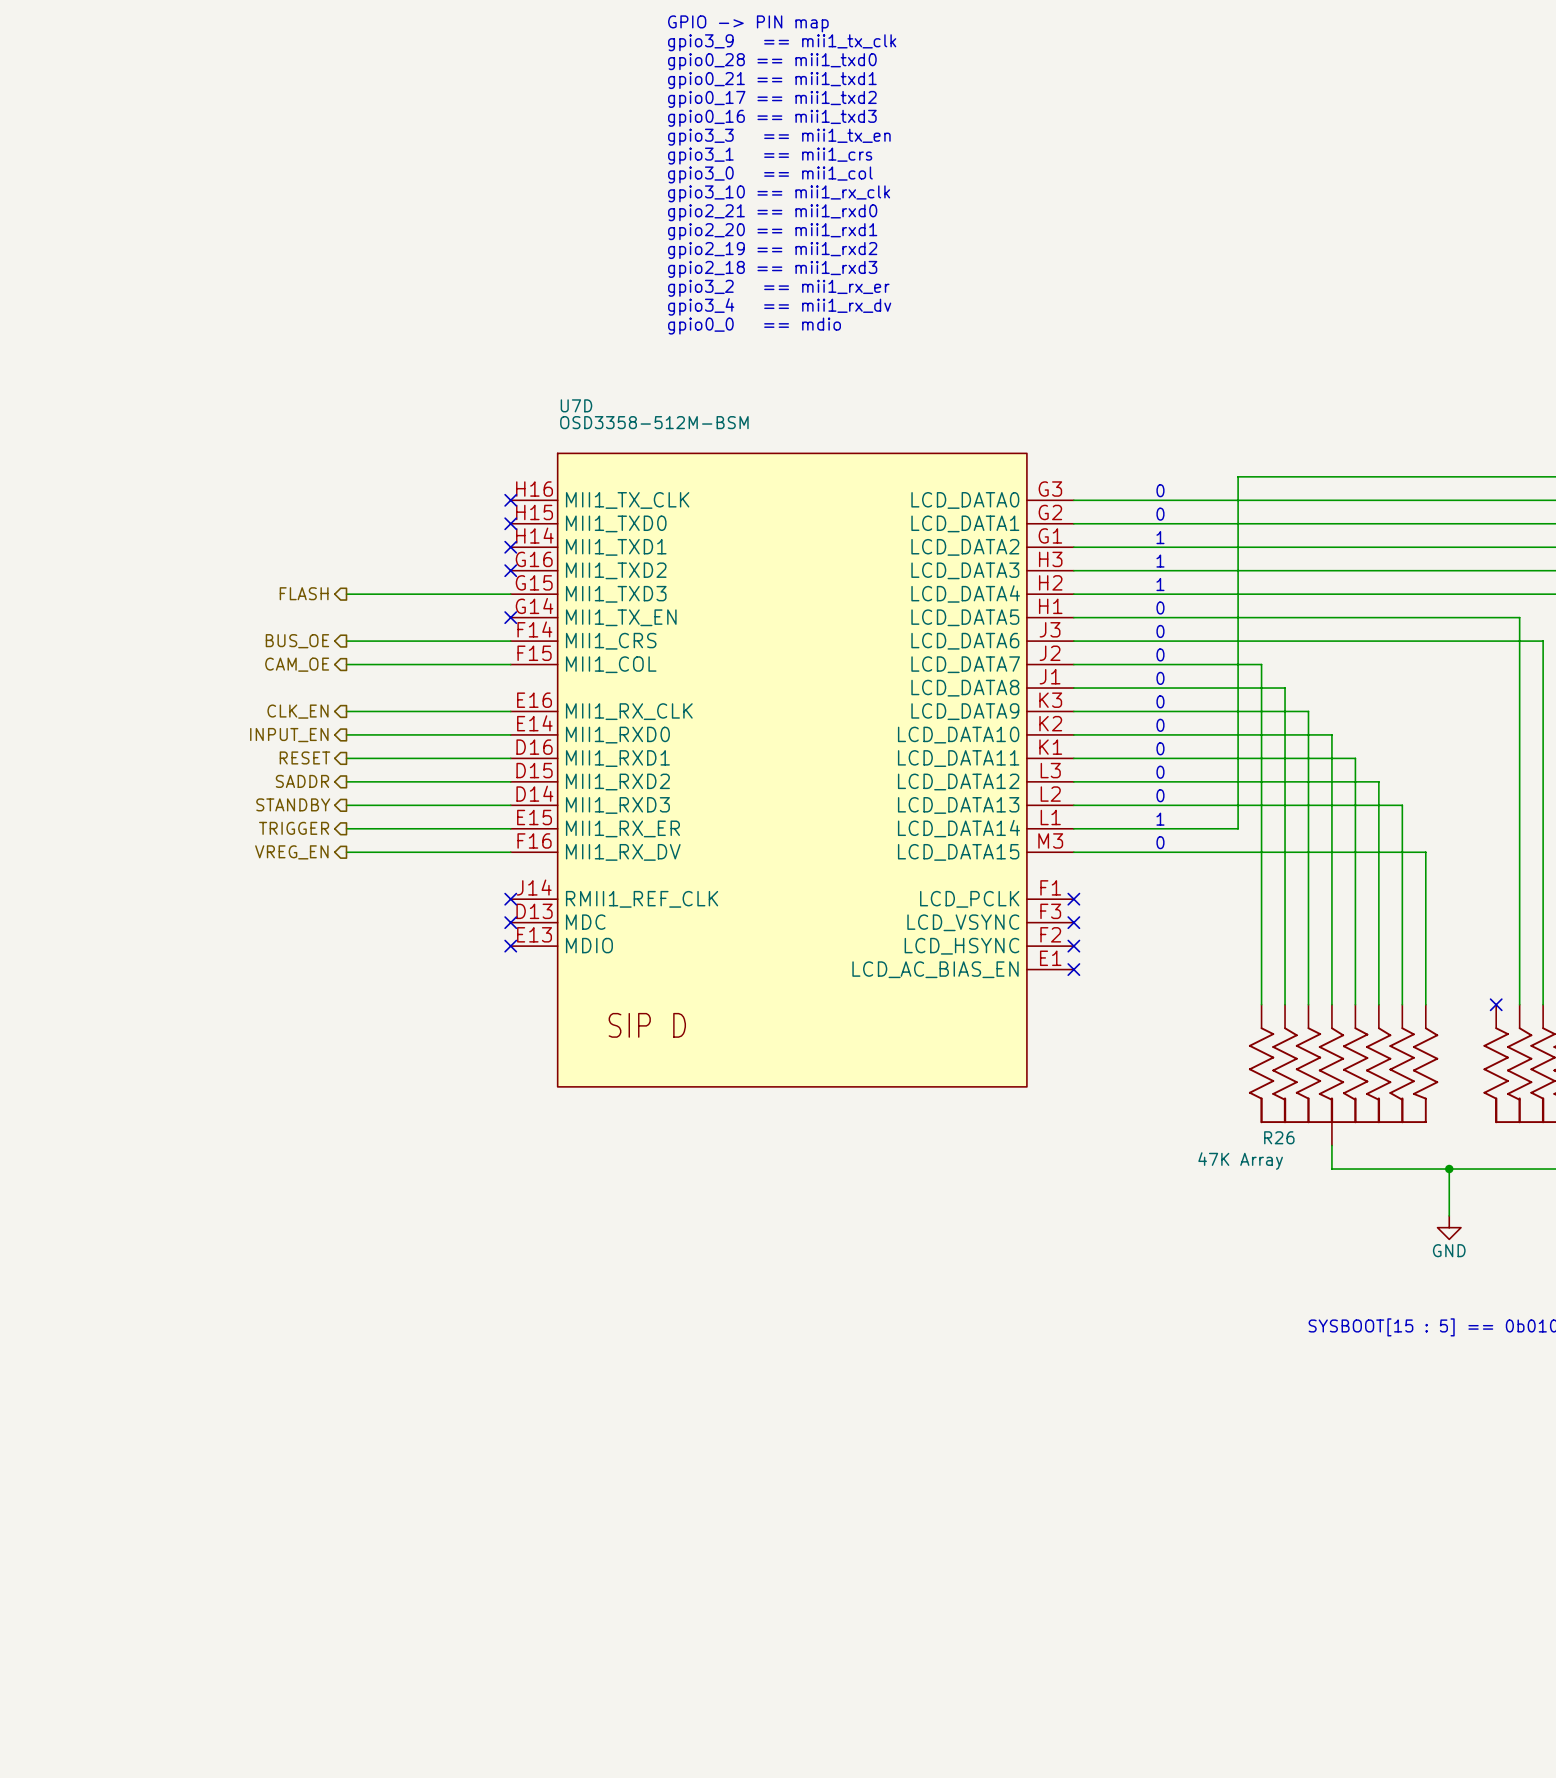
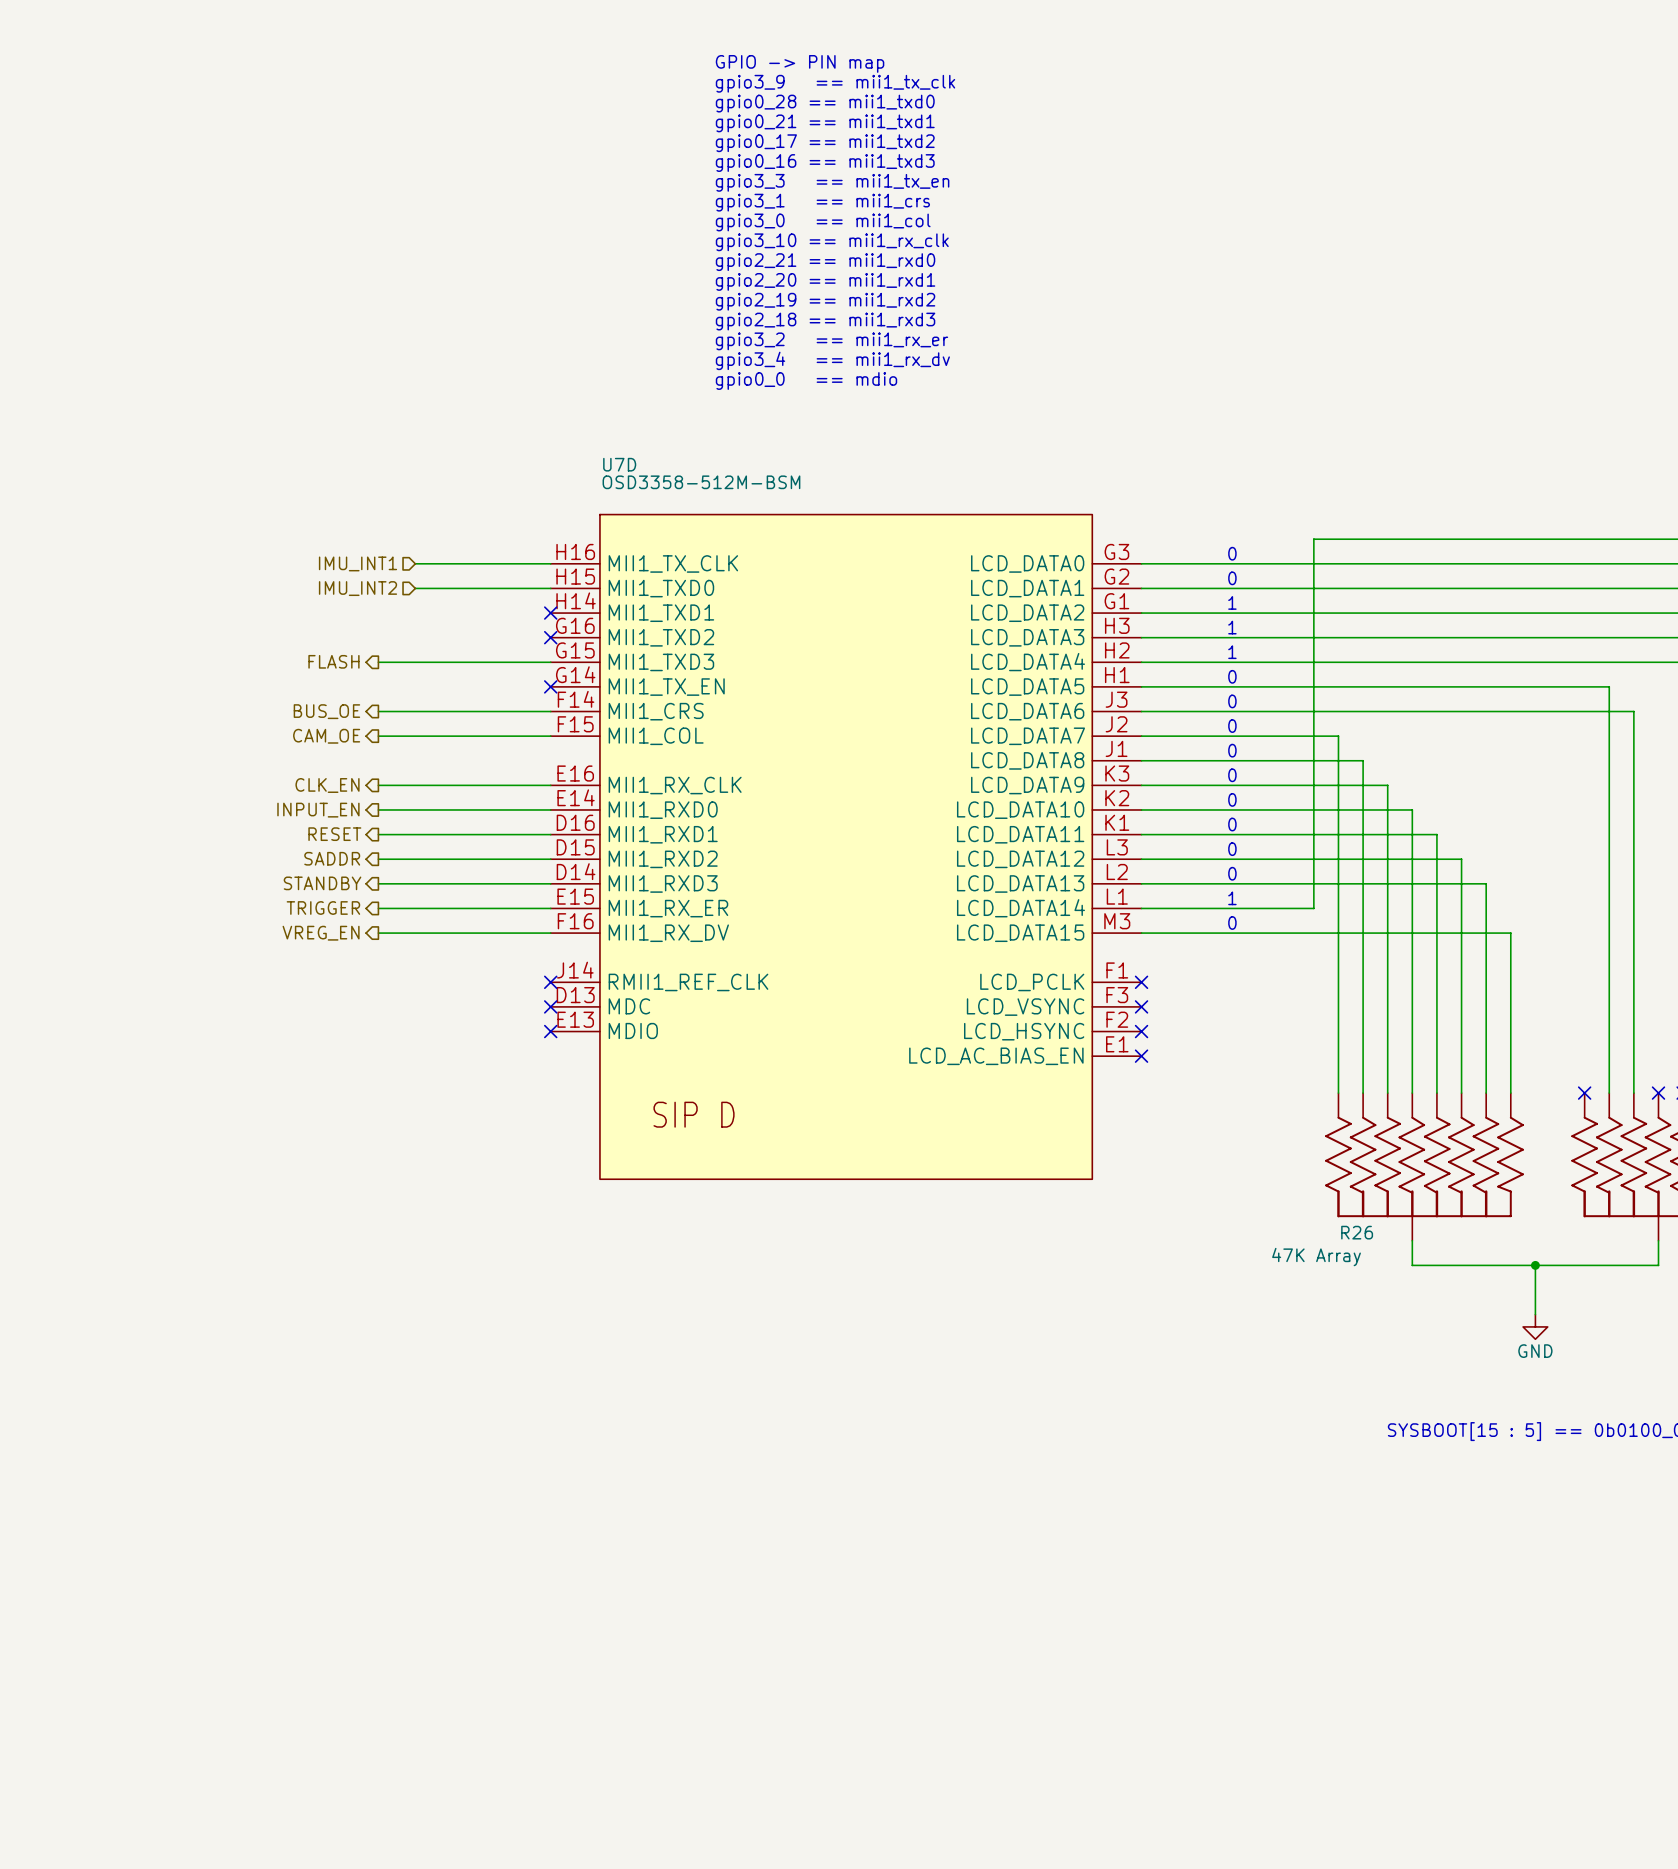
hierarchical label: none -> IMU_INT1 (358, 563)
wire: none -> (415, 563) (550, 563)
no-connect mark: (510, 500) -> none
hierarchical label: none -> IMU_INT2 (358, 588)
wire: none -> (415, 588) (550, 588)
no-connect mark: (510, 523) -> none

